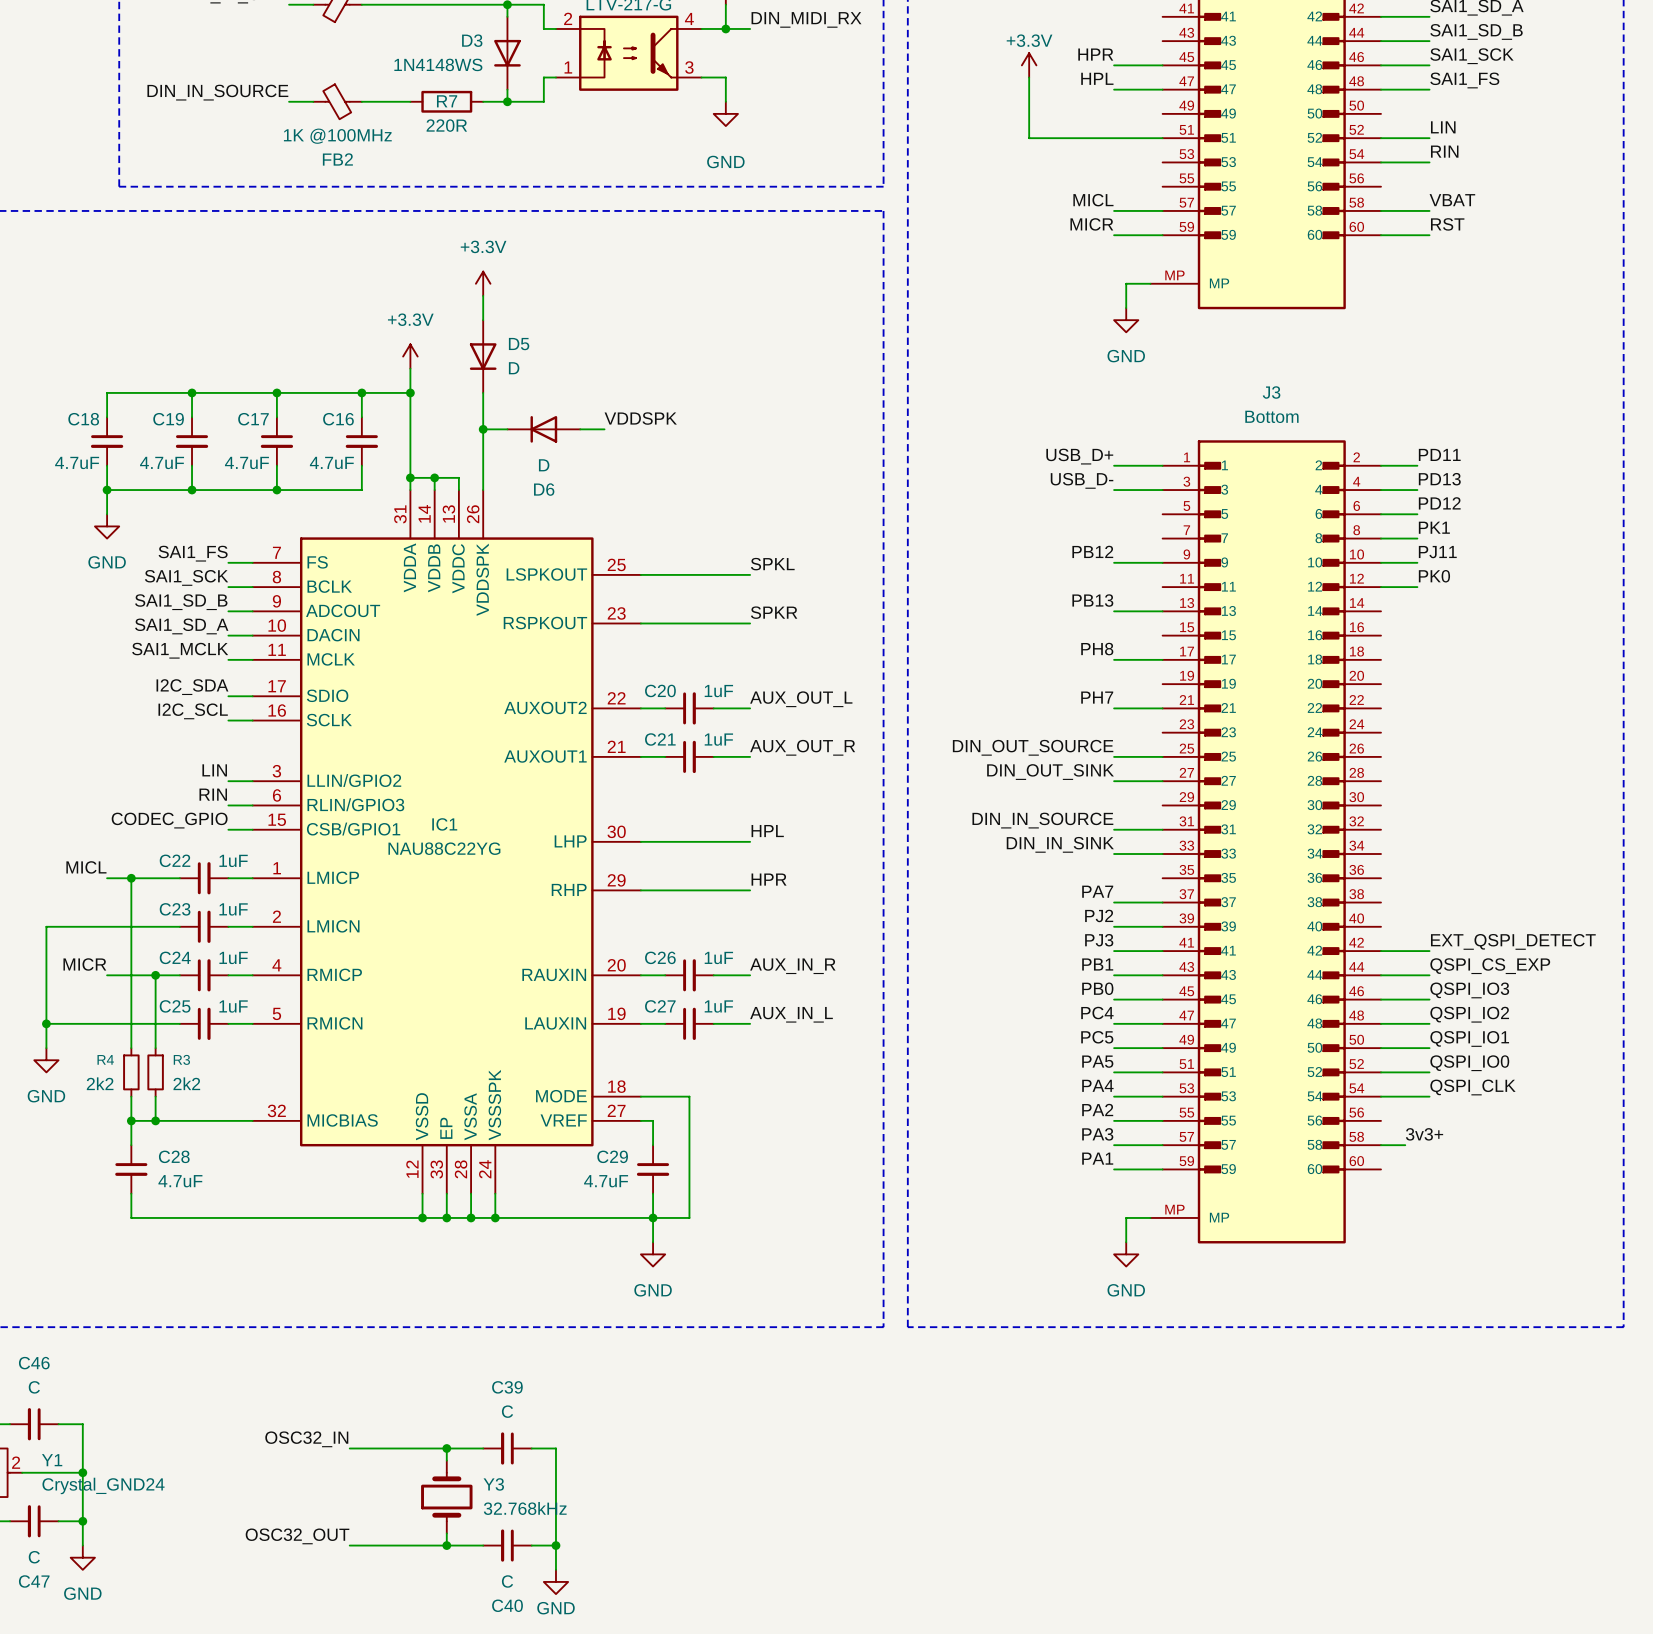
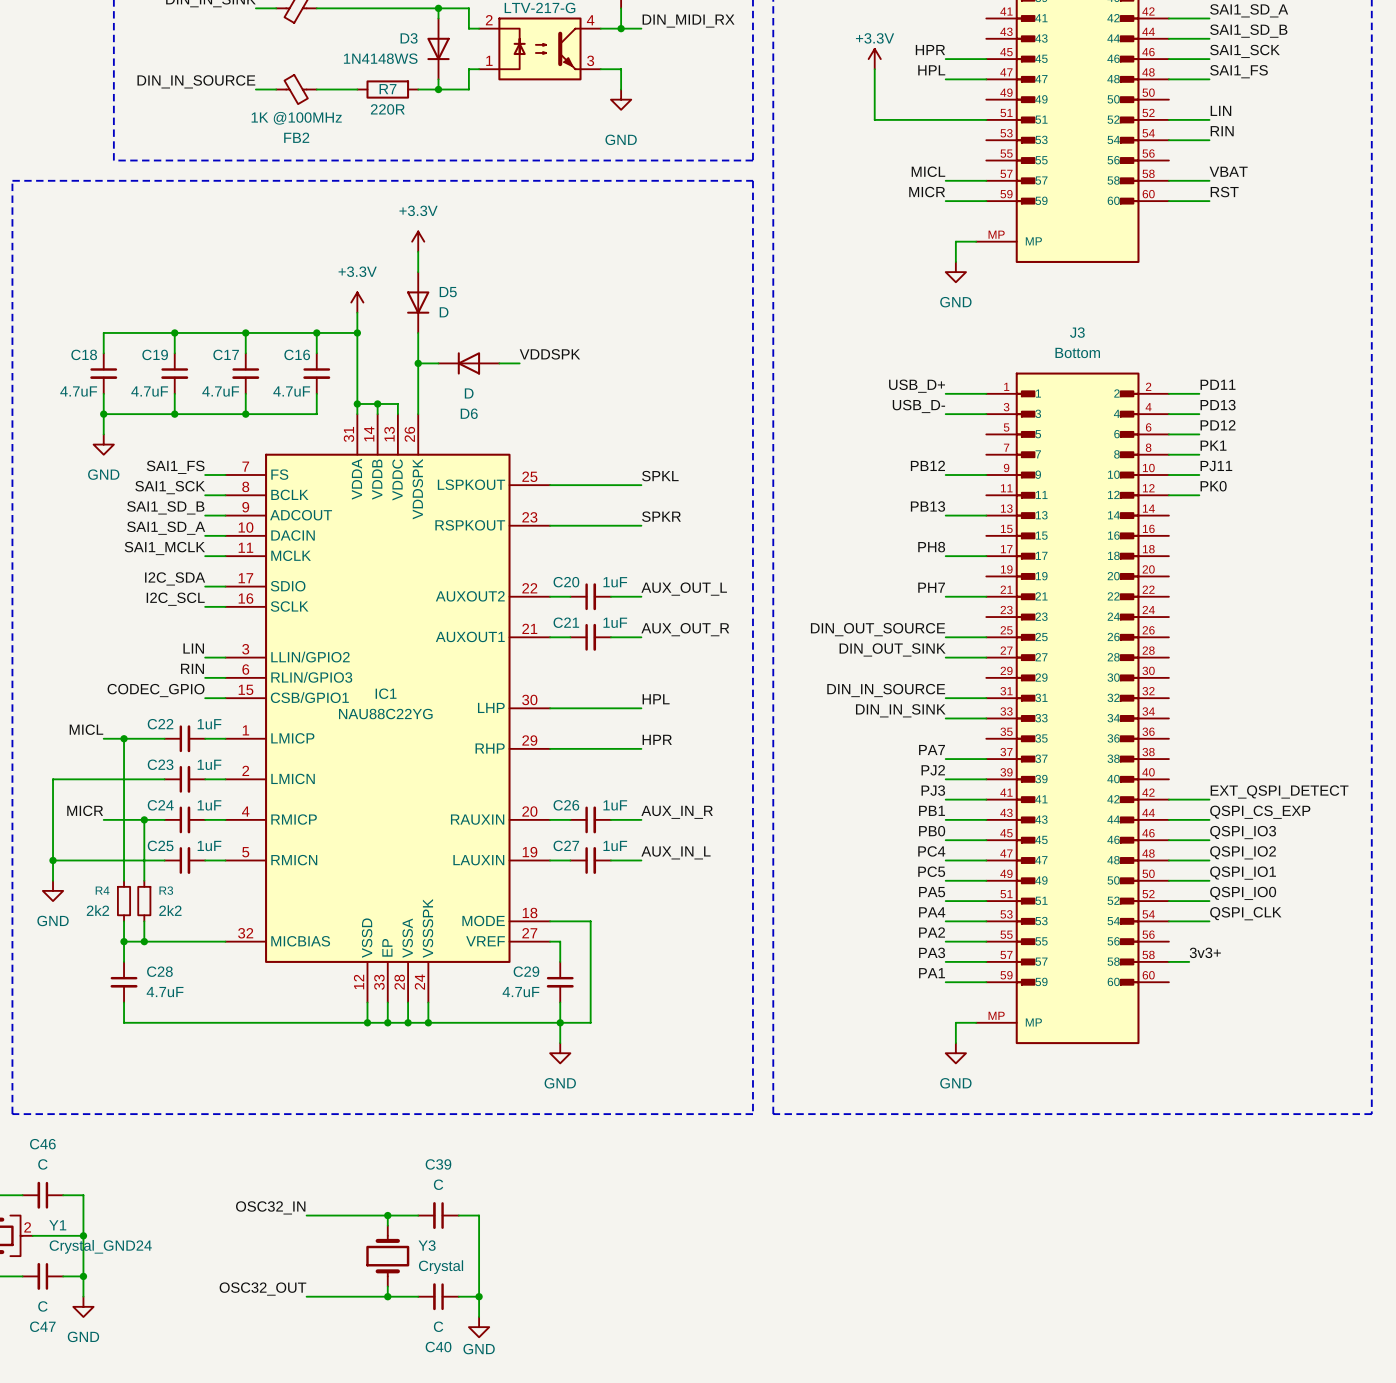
Y3 value: 32.768kHz (525, 1508) -> Crystal (441, 1267)

